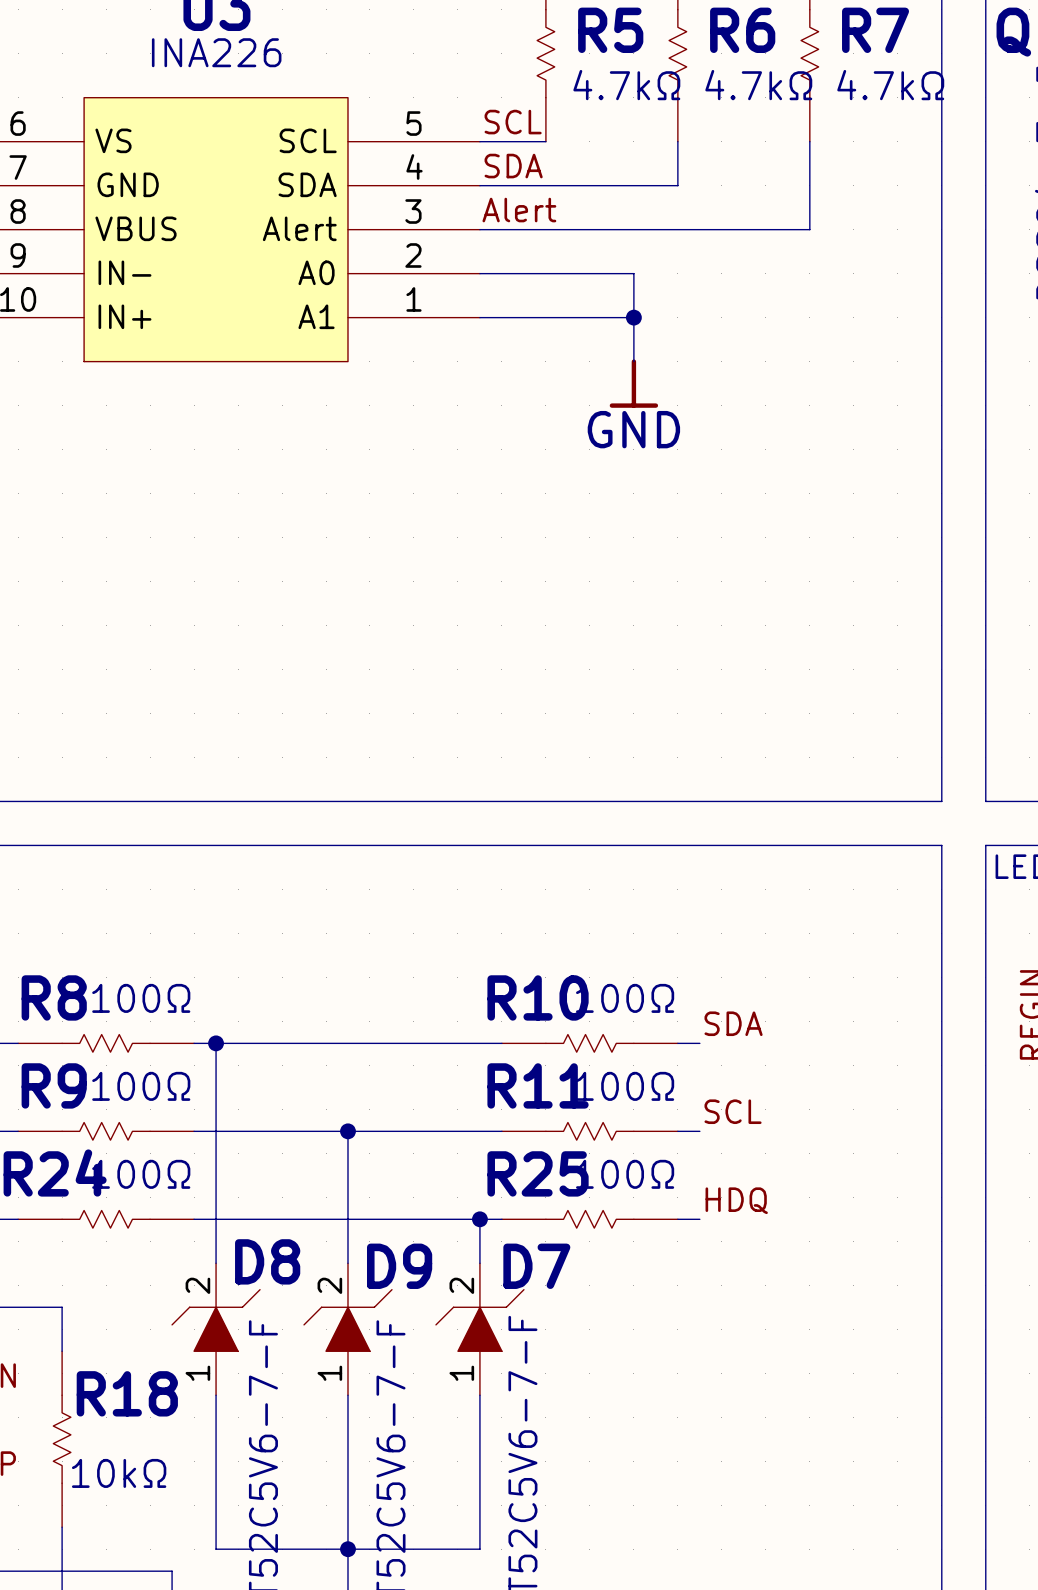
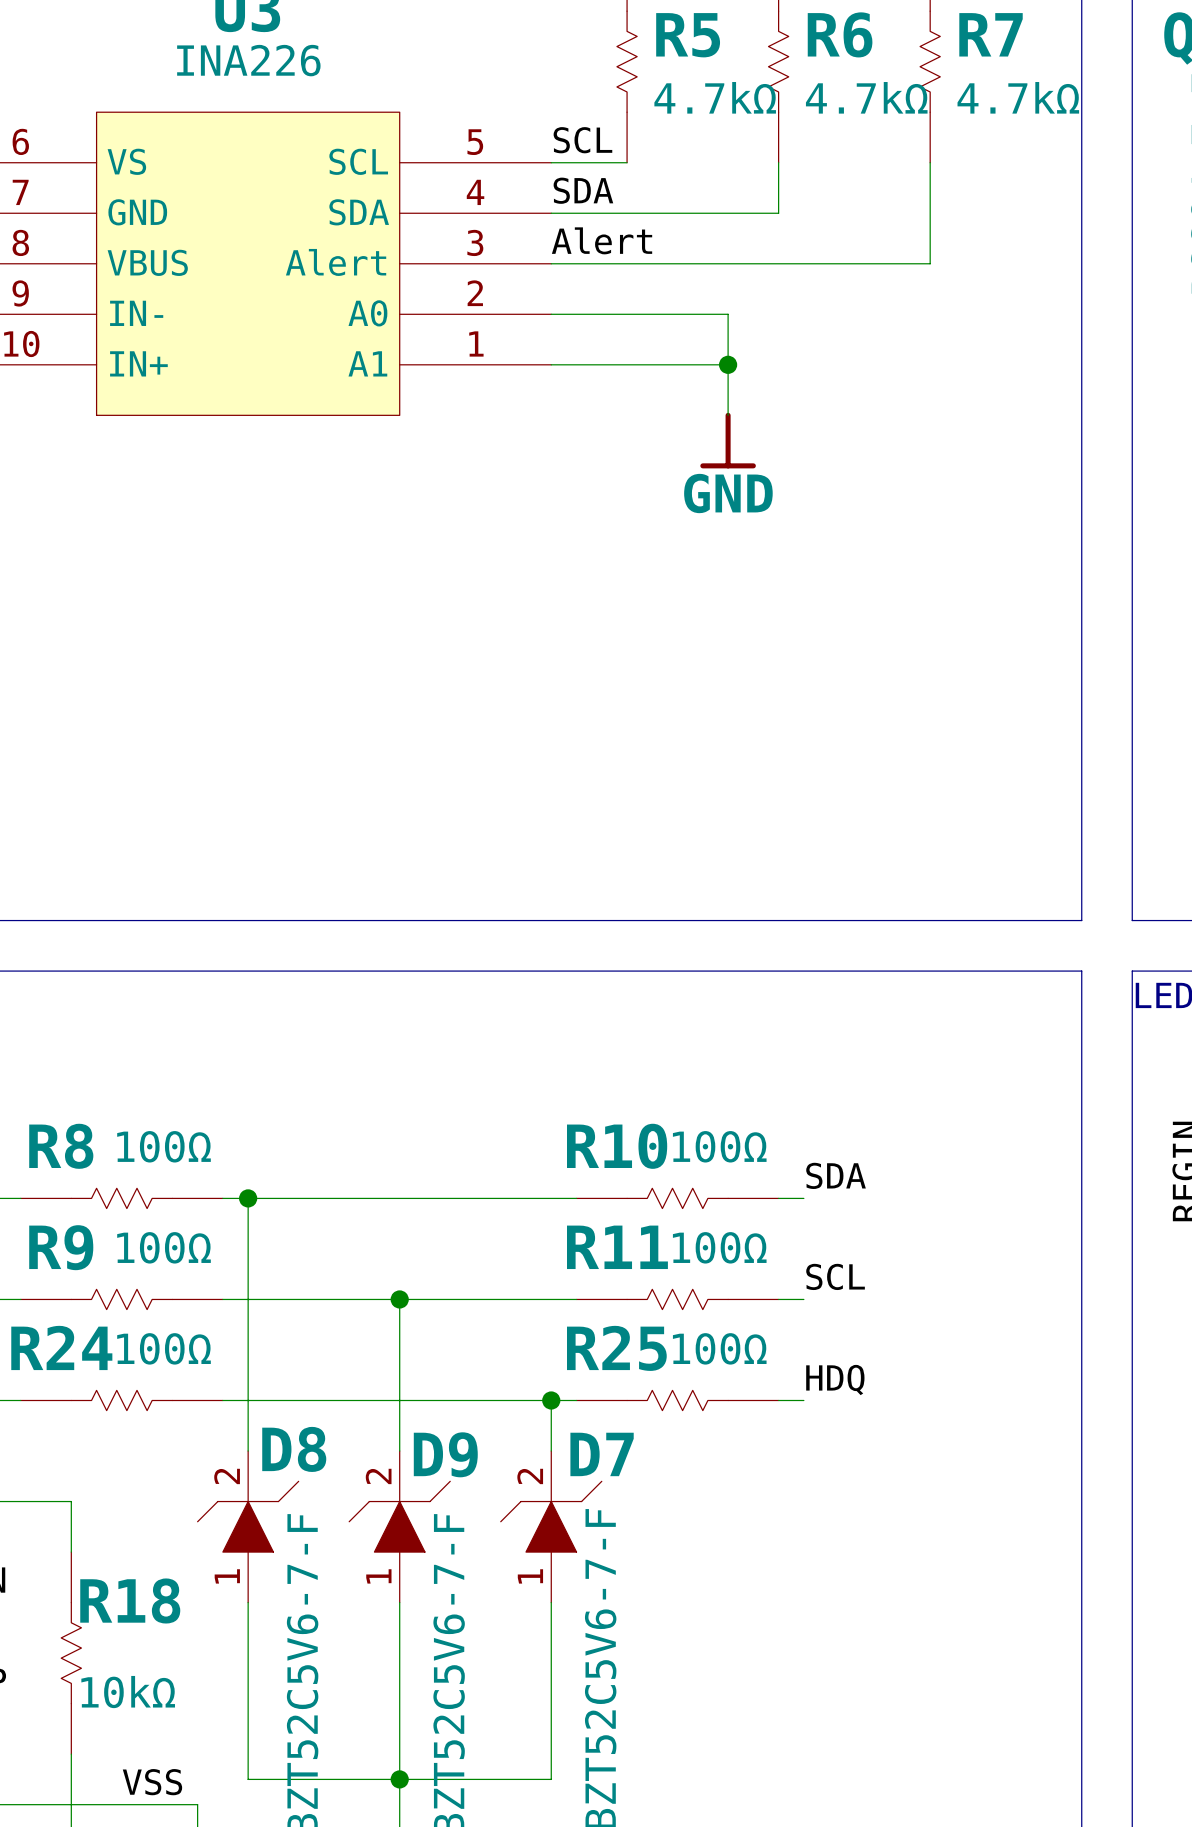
label: none -> VSS (152, 1782)

